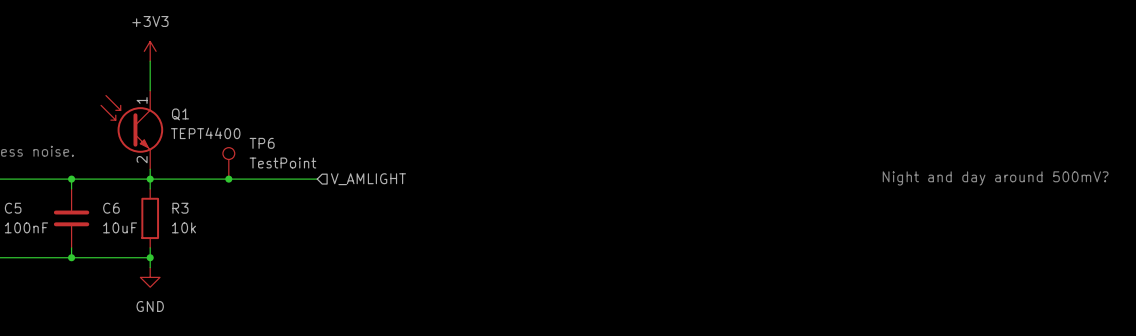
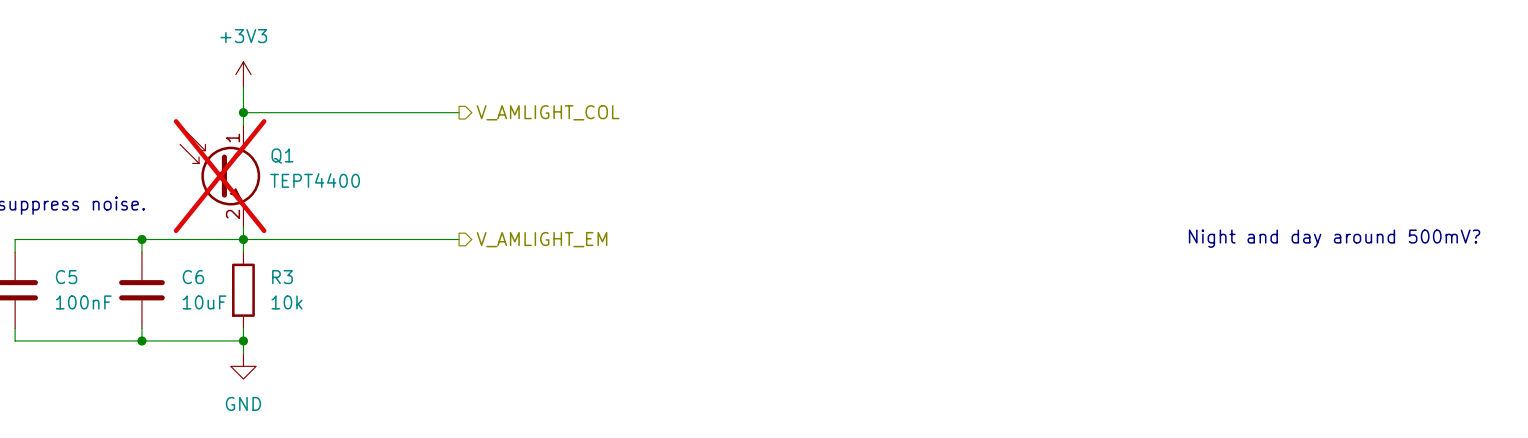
wire: none -> (243, 112) (459, 112)
junction: none -> (243, 112)
hierarchical label: none -> V_AMLIGHT_COL (548, 112)
Q1 do-not-place cross: none -> (220, 176)
TP6: TestPoint (228, 163) -> none
junction: (228, 179) -> none
hierarchical label shape: input (368, 179) -> output (542, 239)
hierarchical label: V_AMLIGHT (368, 179) -> V_AMLIGHT_EM (542, 239)

